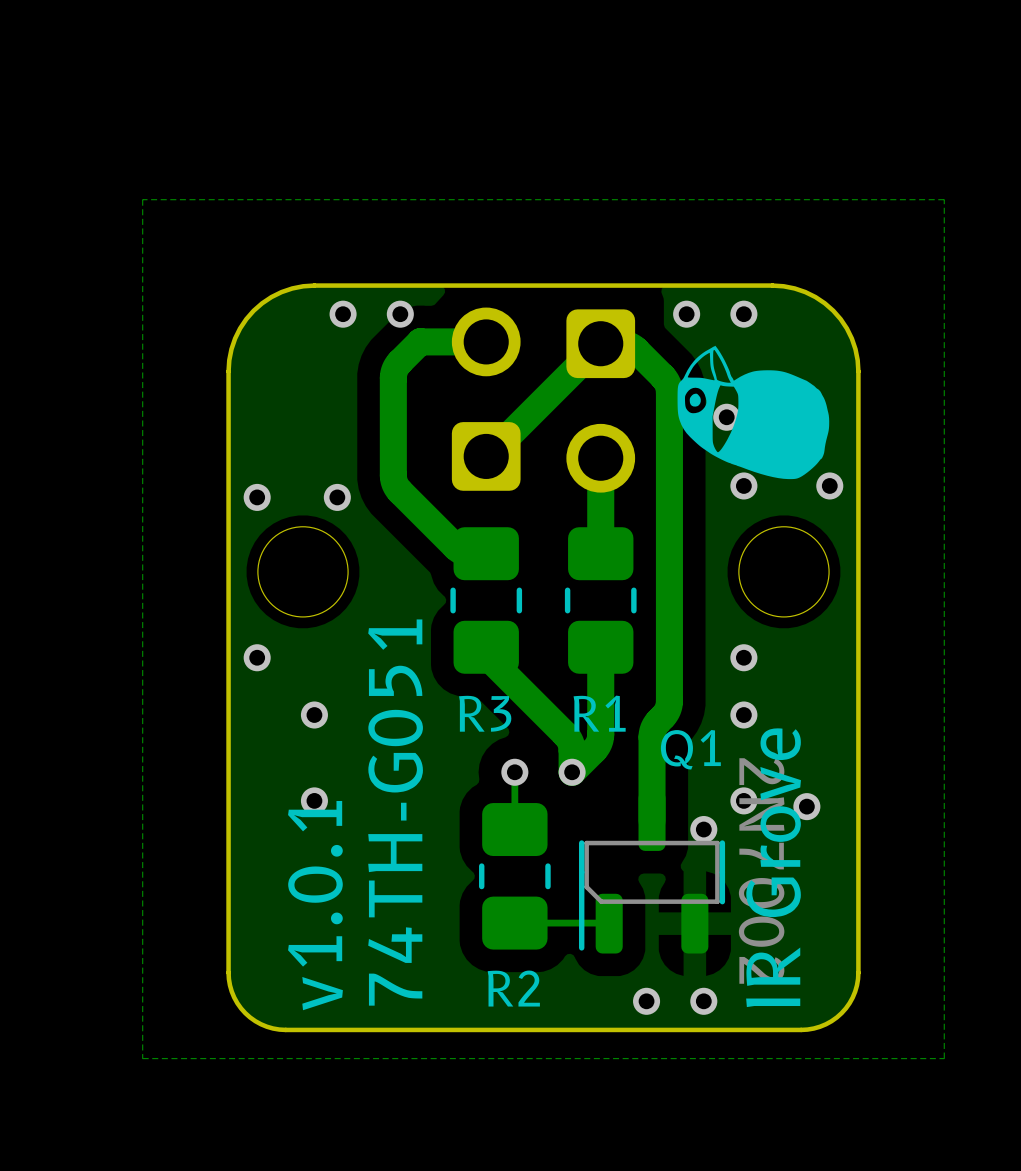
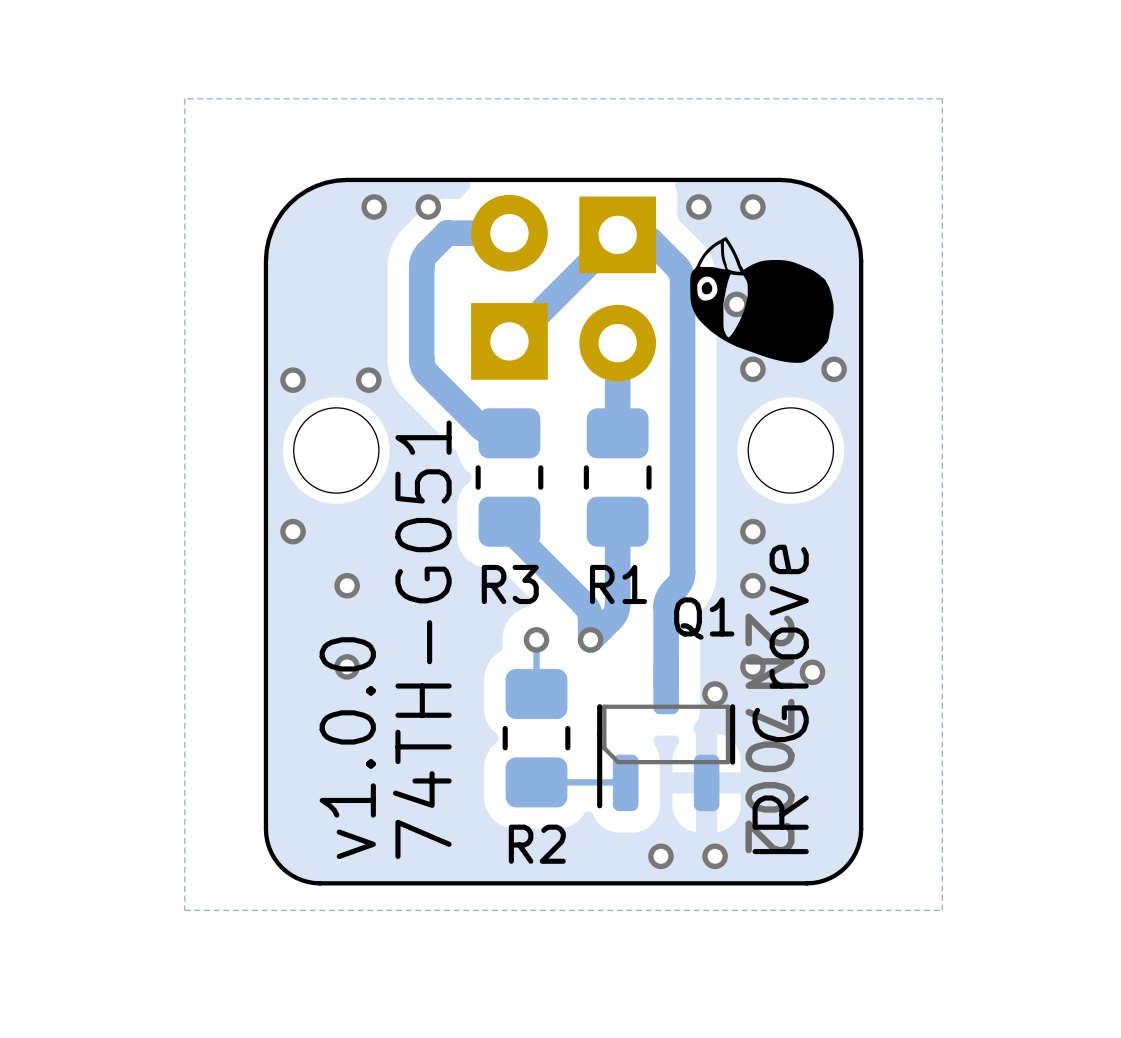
part footprint: [451, 307, 521, 491] -> [471, 194, 548, 380]
part footprint: [566, 309, 636, 493] -> [579, 196, 657, 382]
text: v1.0.1 (315, 905) -> v1.0.0 (347, 748)

